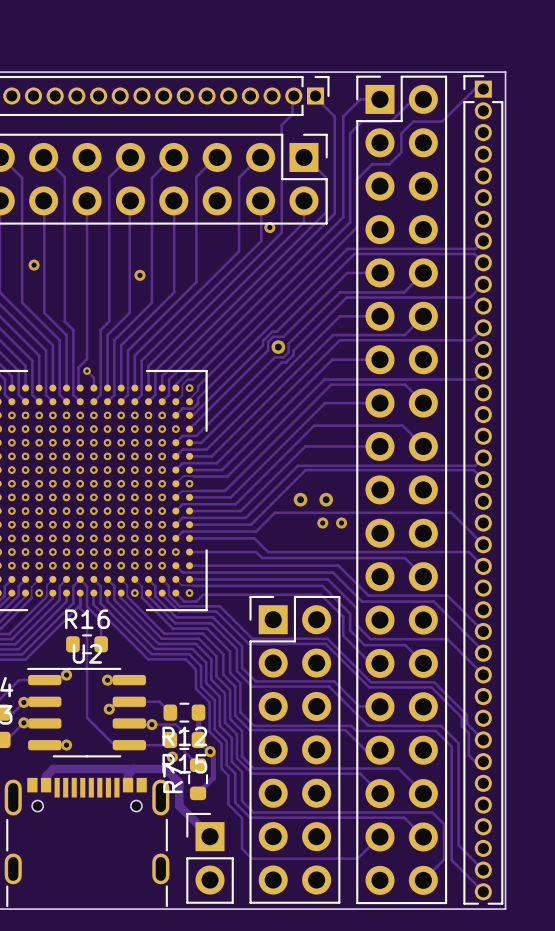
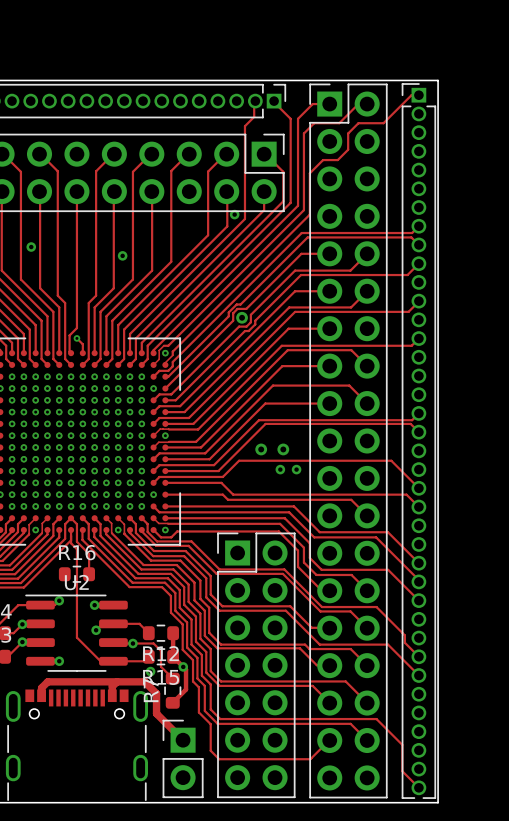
track: (404, 687) (431, 687) (461, 717) (461, 726) (468, 733) (468, 755) (475, 761) (483, 761) -> (382, 644) (388, 644) (418, 675)
track: none -> (350, 611) (366, 627)
track: (441, 725) (458, 743) (458, 845) (483, 870) -> none
track: (404, 730) (435, 730) (451, 746) (451, 860) (464, 872) -> (350, 649) (366, 665)
track: (253, 812) (432, 812) (444, 824) (444, 859) (423, 880) -> (220, 719) (376, 719) (402, 744) (402, 771)

